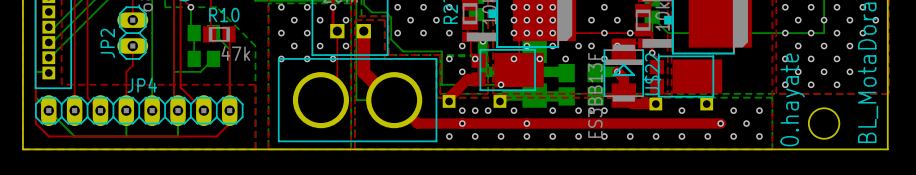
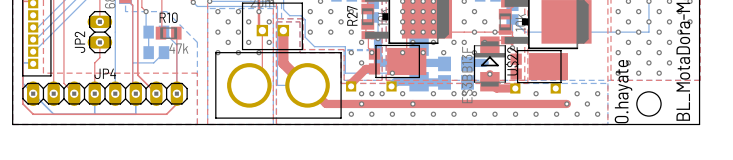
top track: (617, 71) (623, 78) (623, 86) -> none
via position: (617, 71) -> (489, 74)

